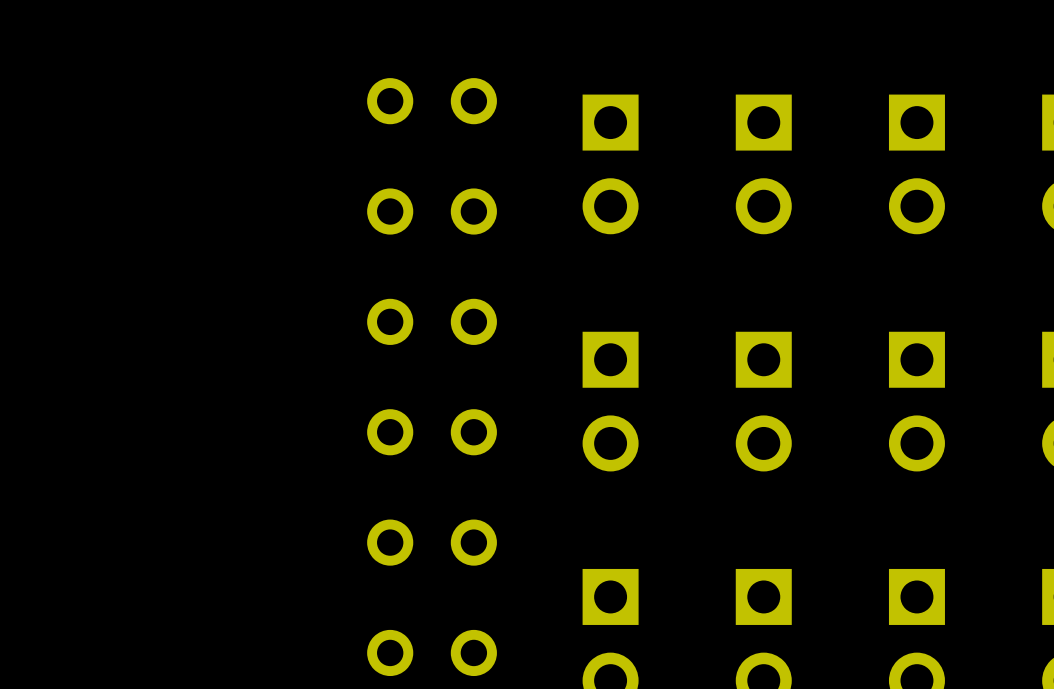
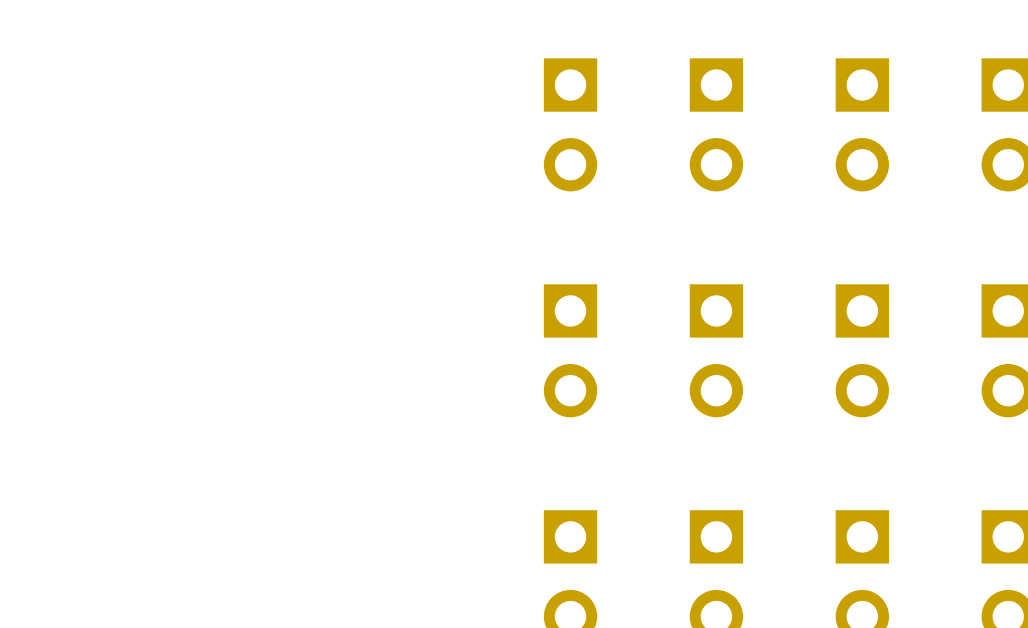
part: (432, 101) -> none
part: (432, 211) -> none
part: (432, 321) -> none
part: (432, 432) -> none
part: (432, 542) -> none
part: (432, 652) -> none

